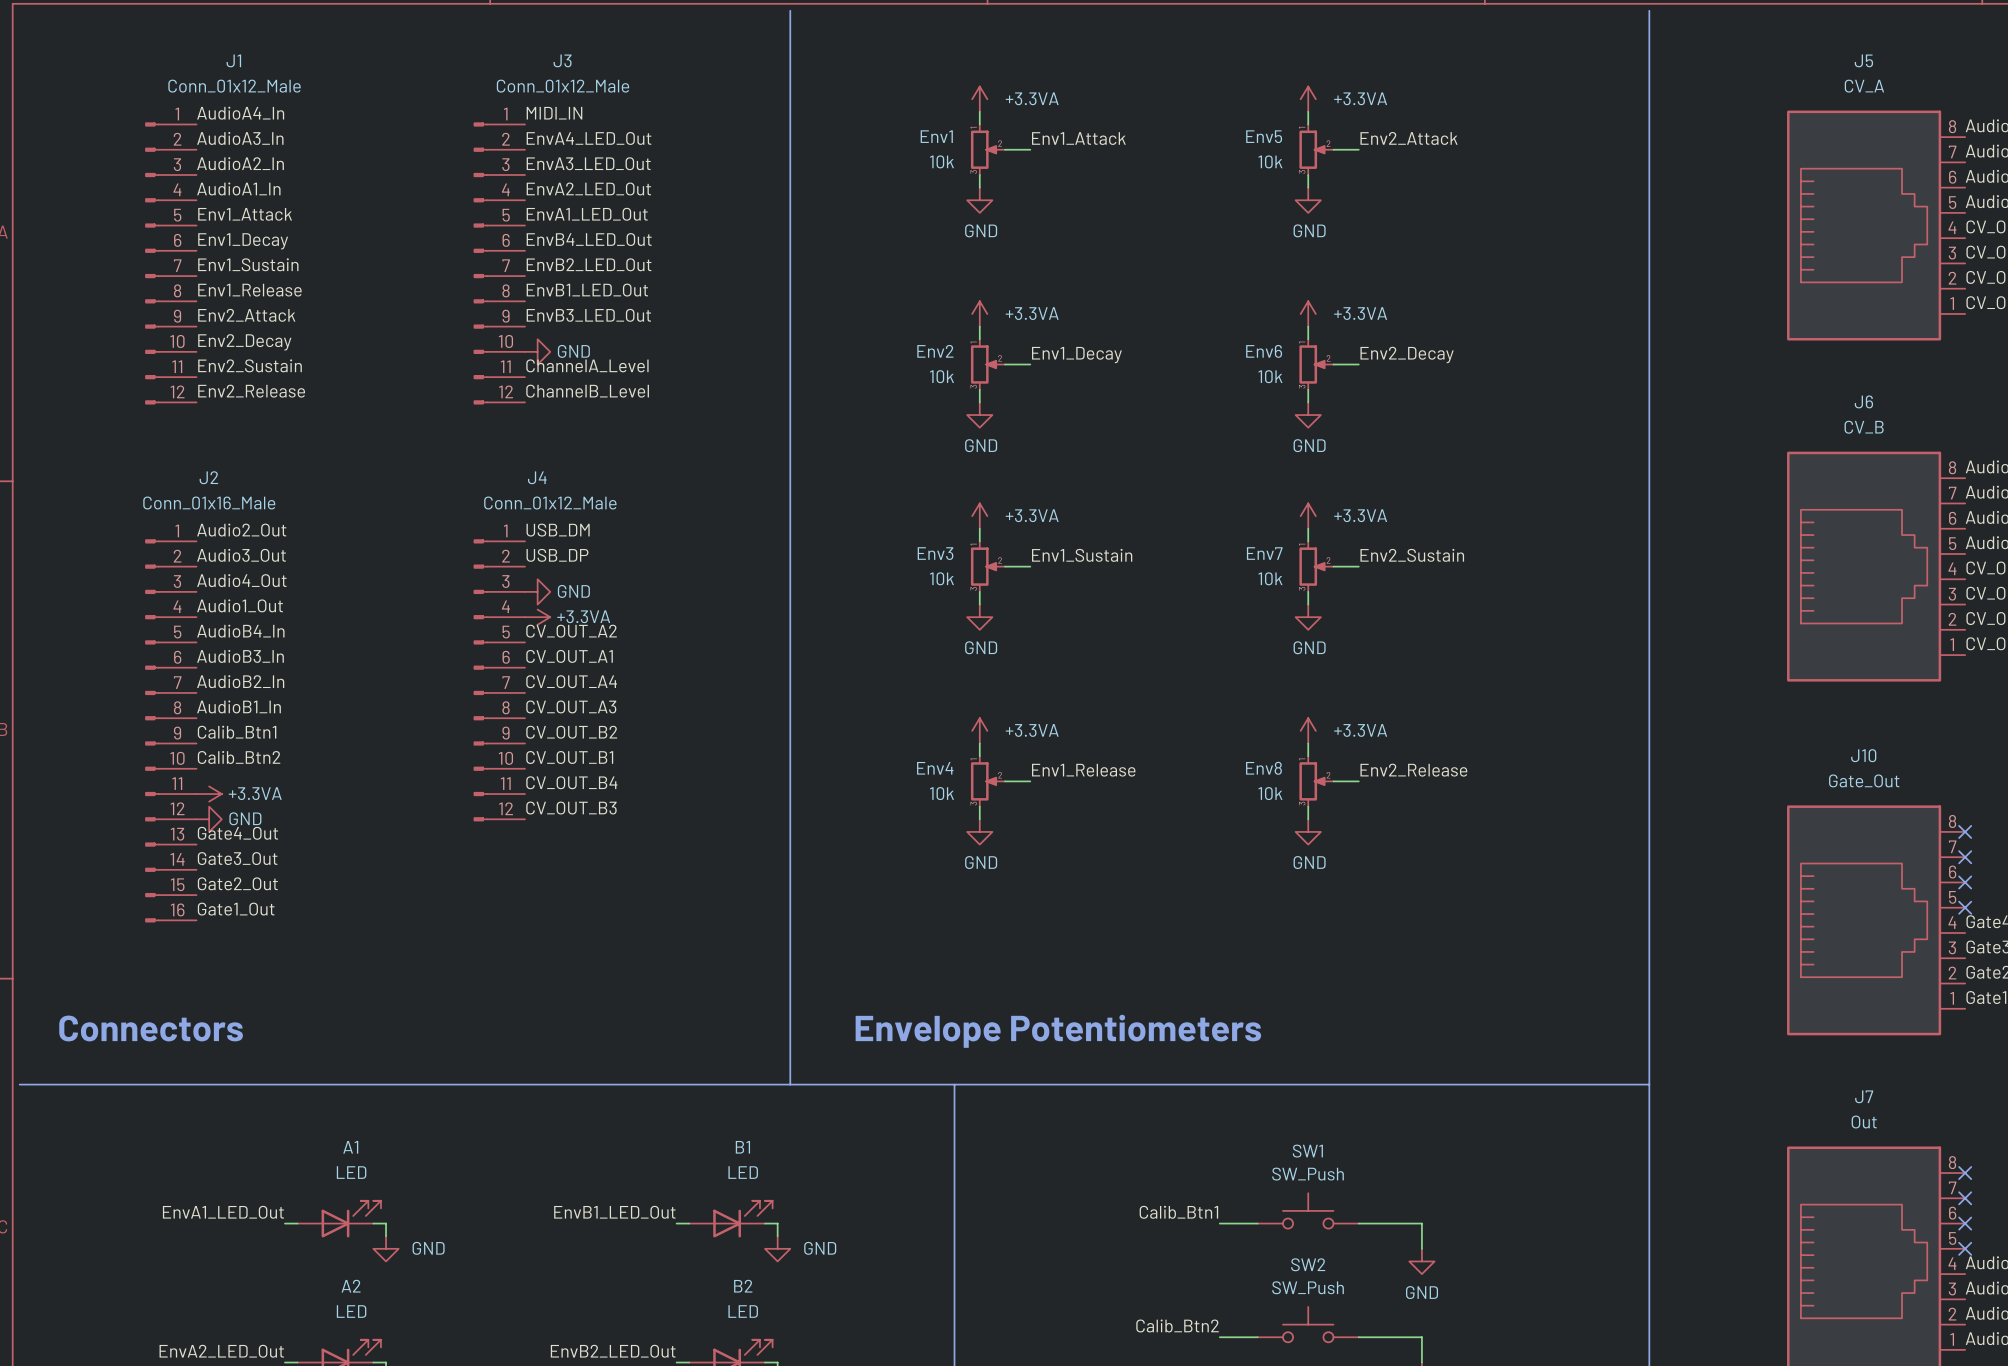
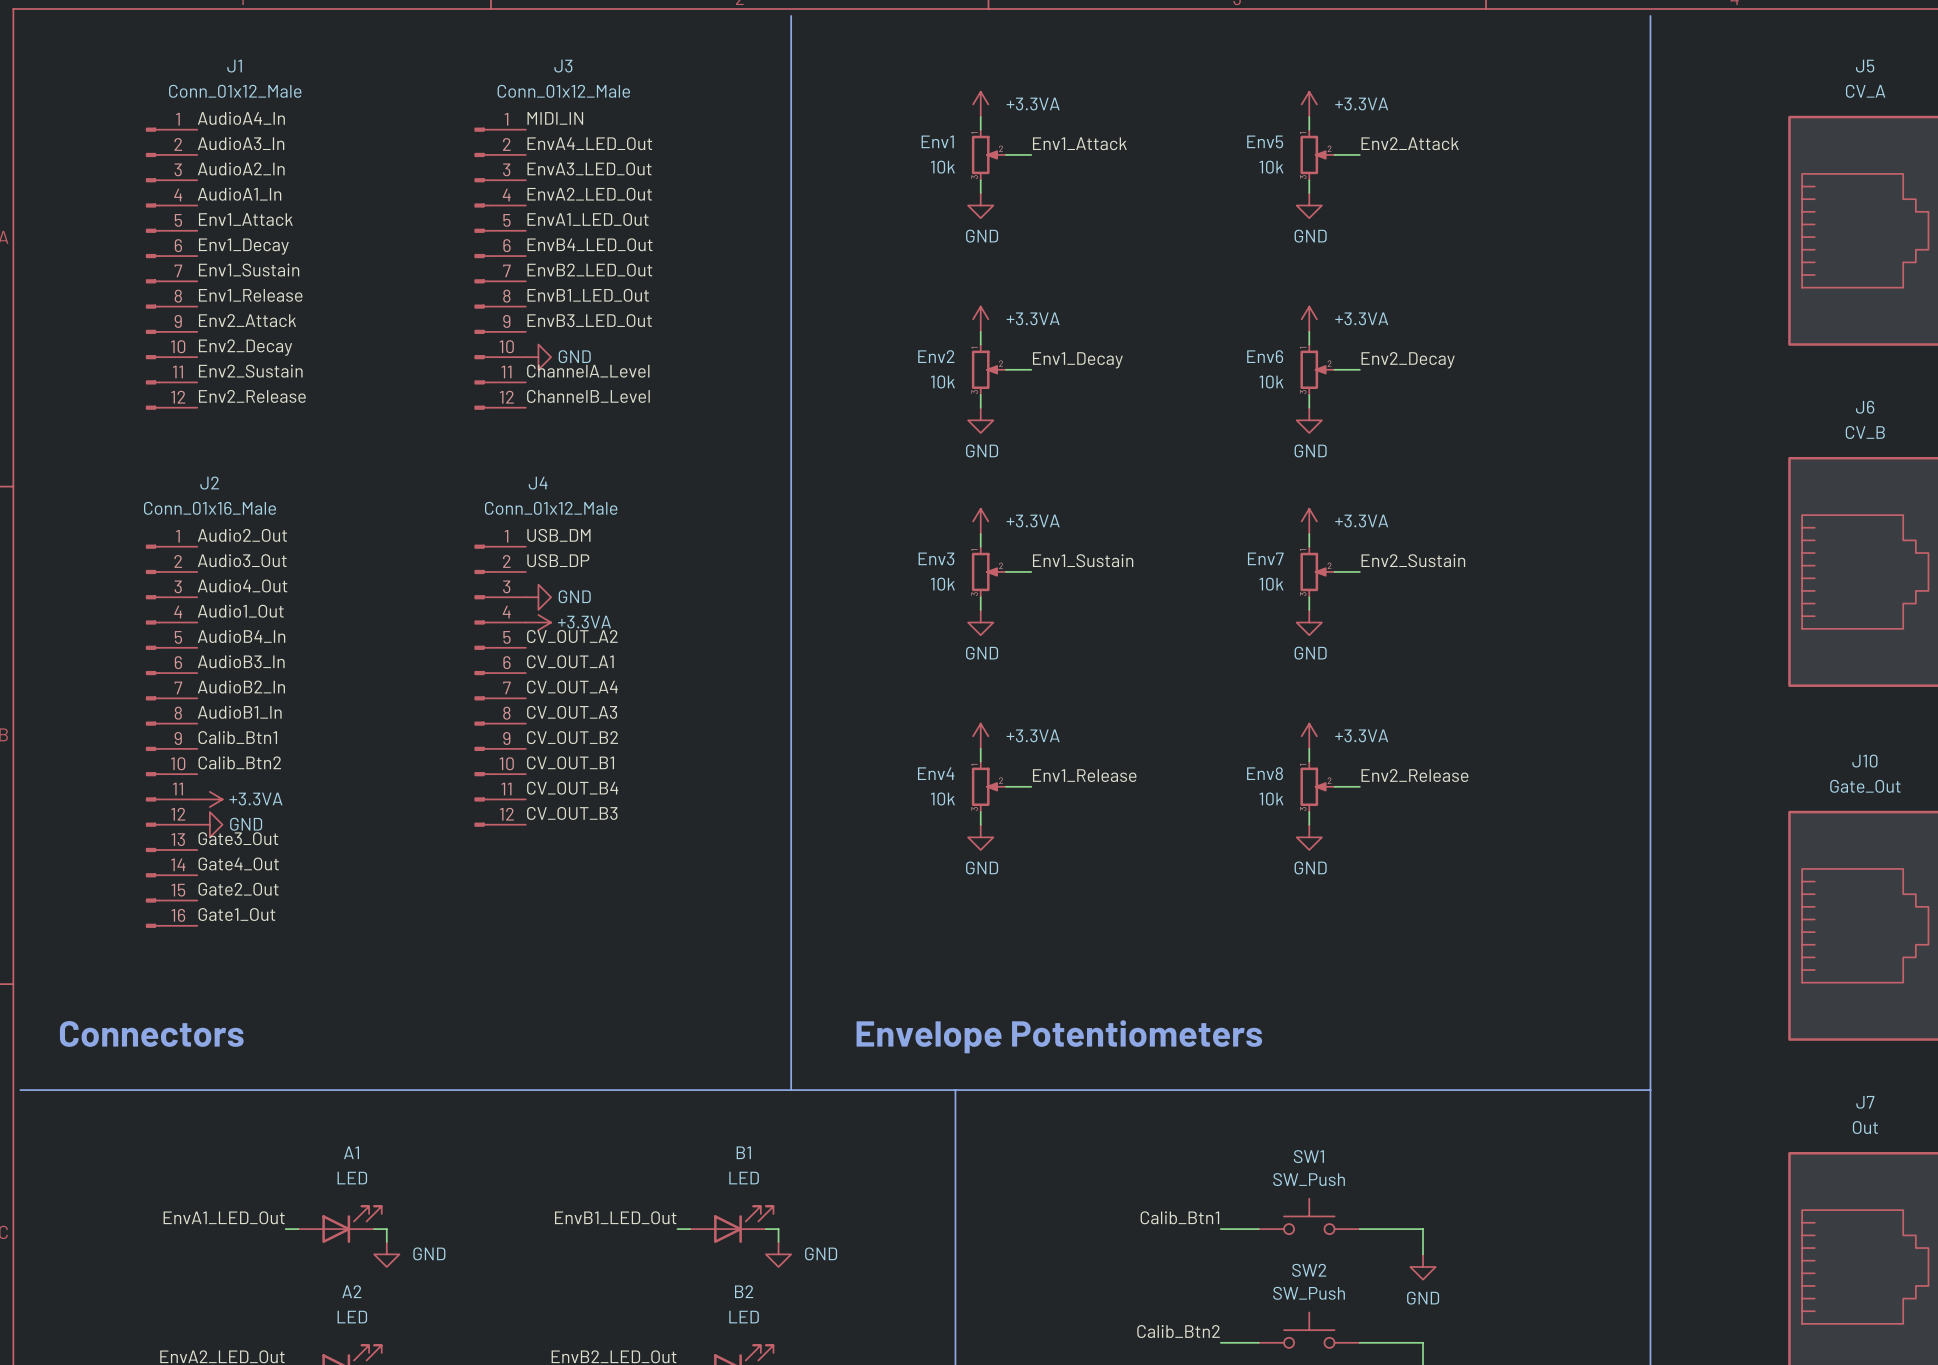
label: Gate4_Out (237, 833) -> Gate3_Out (238, 838)
label: Gate3_Out (237, 858) -> Gate4_Out (238, 863)

